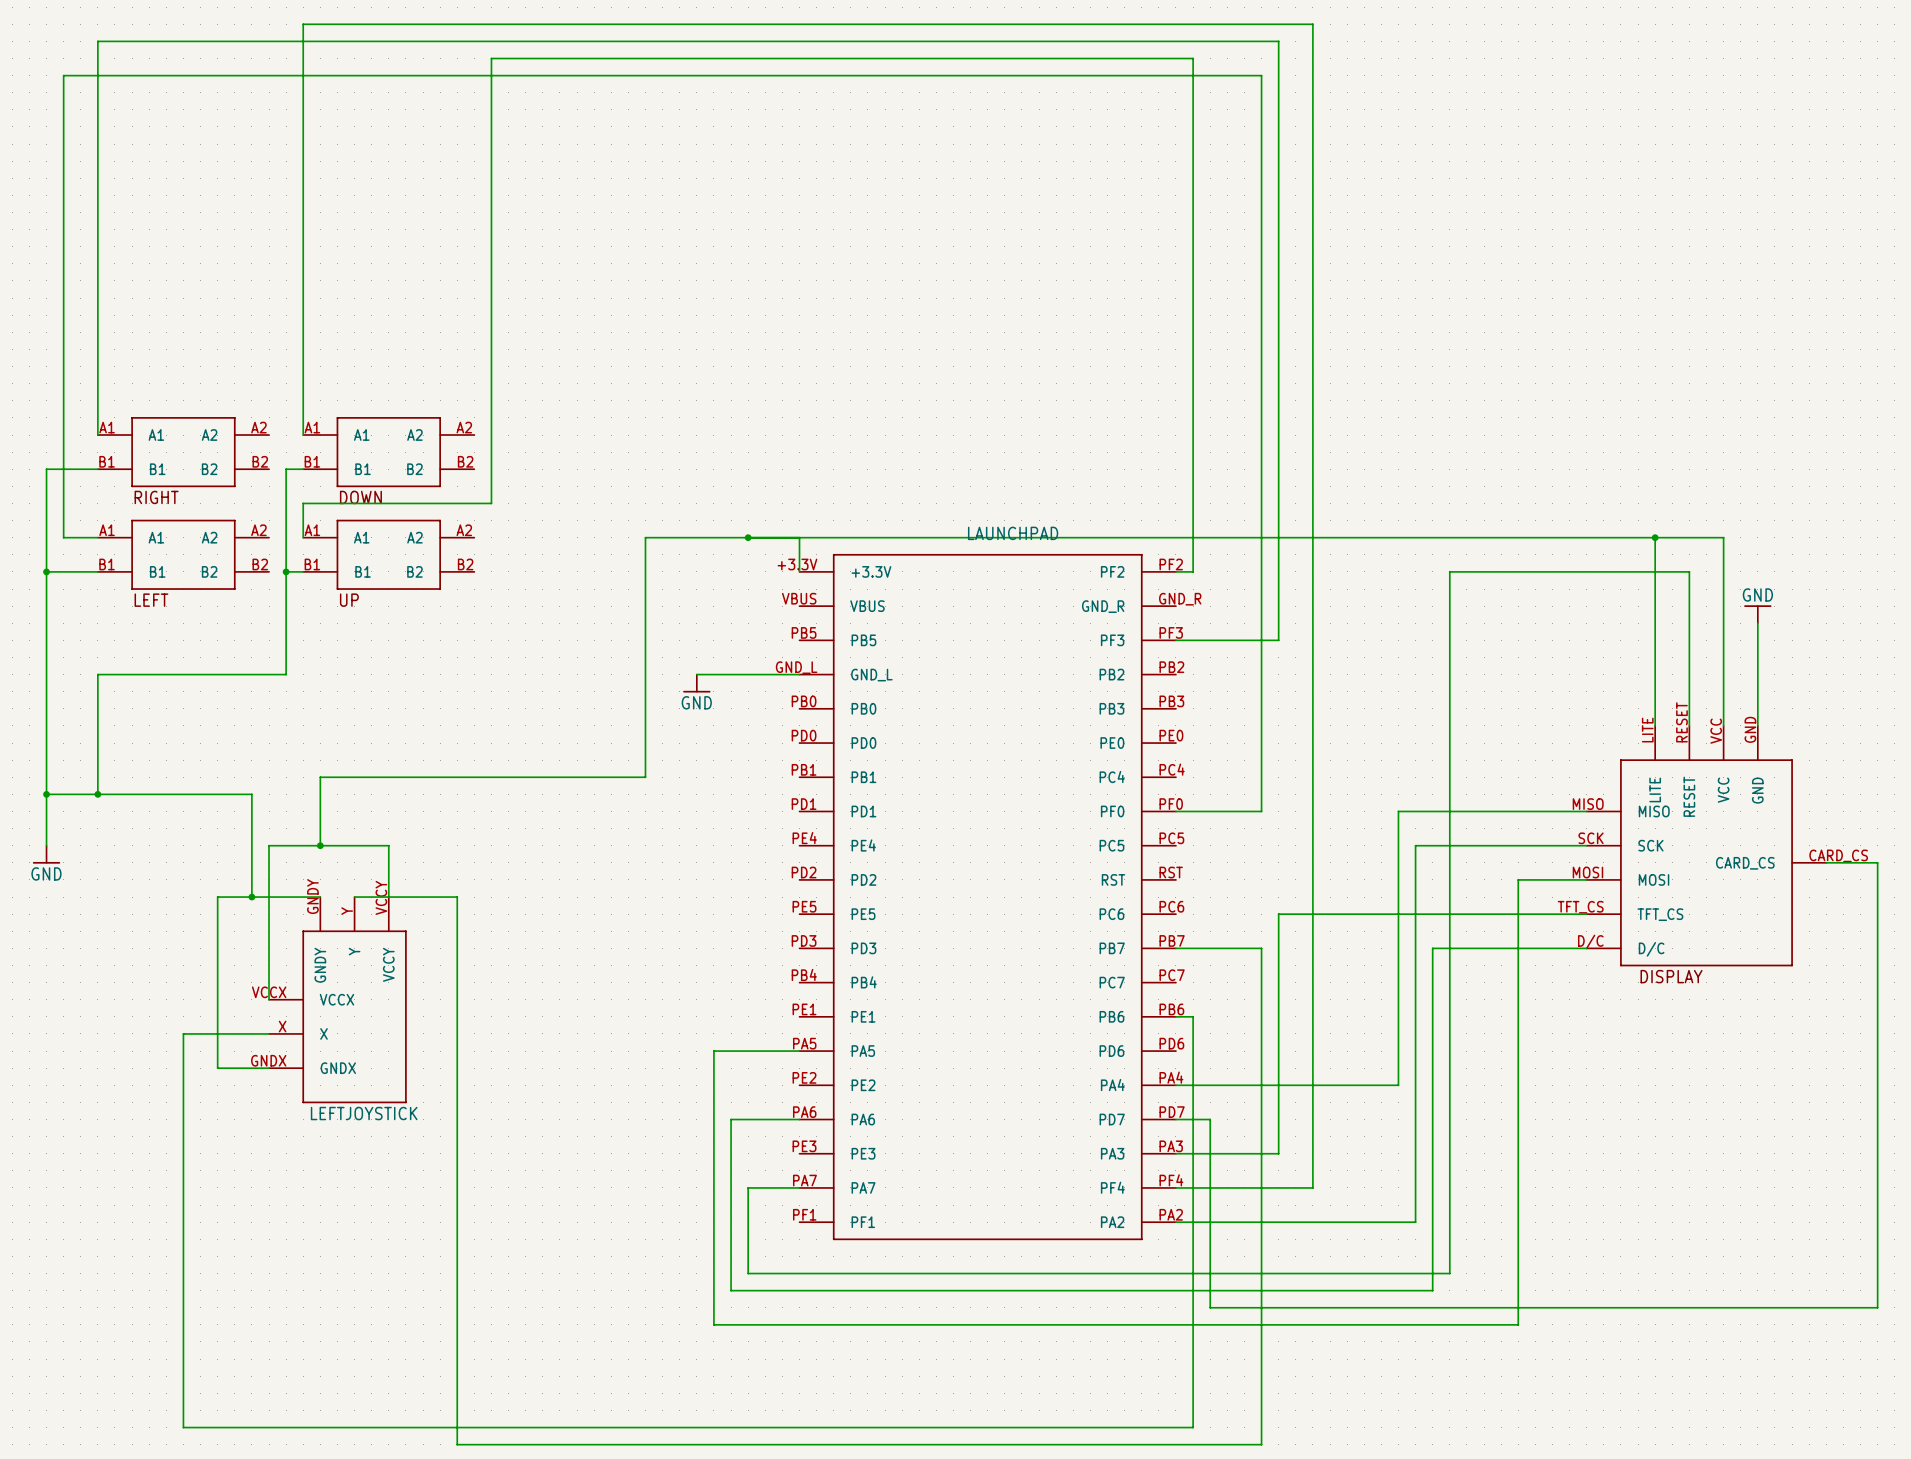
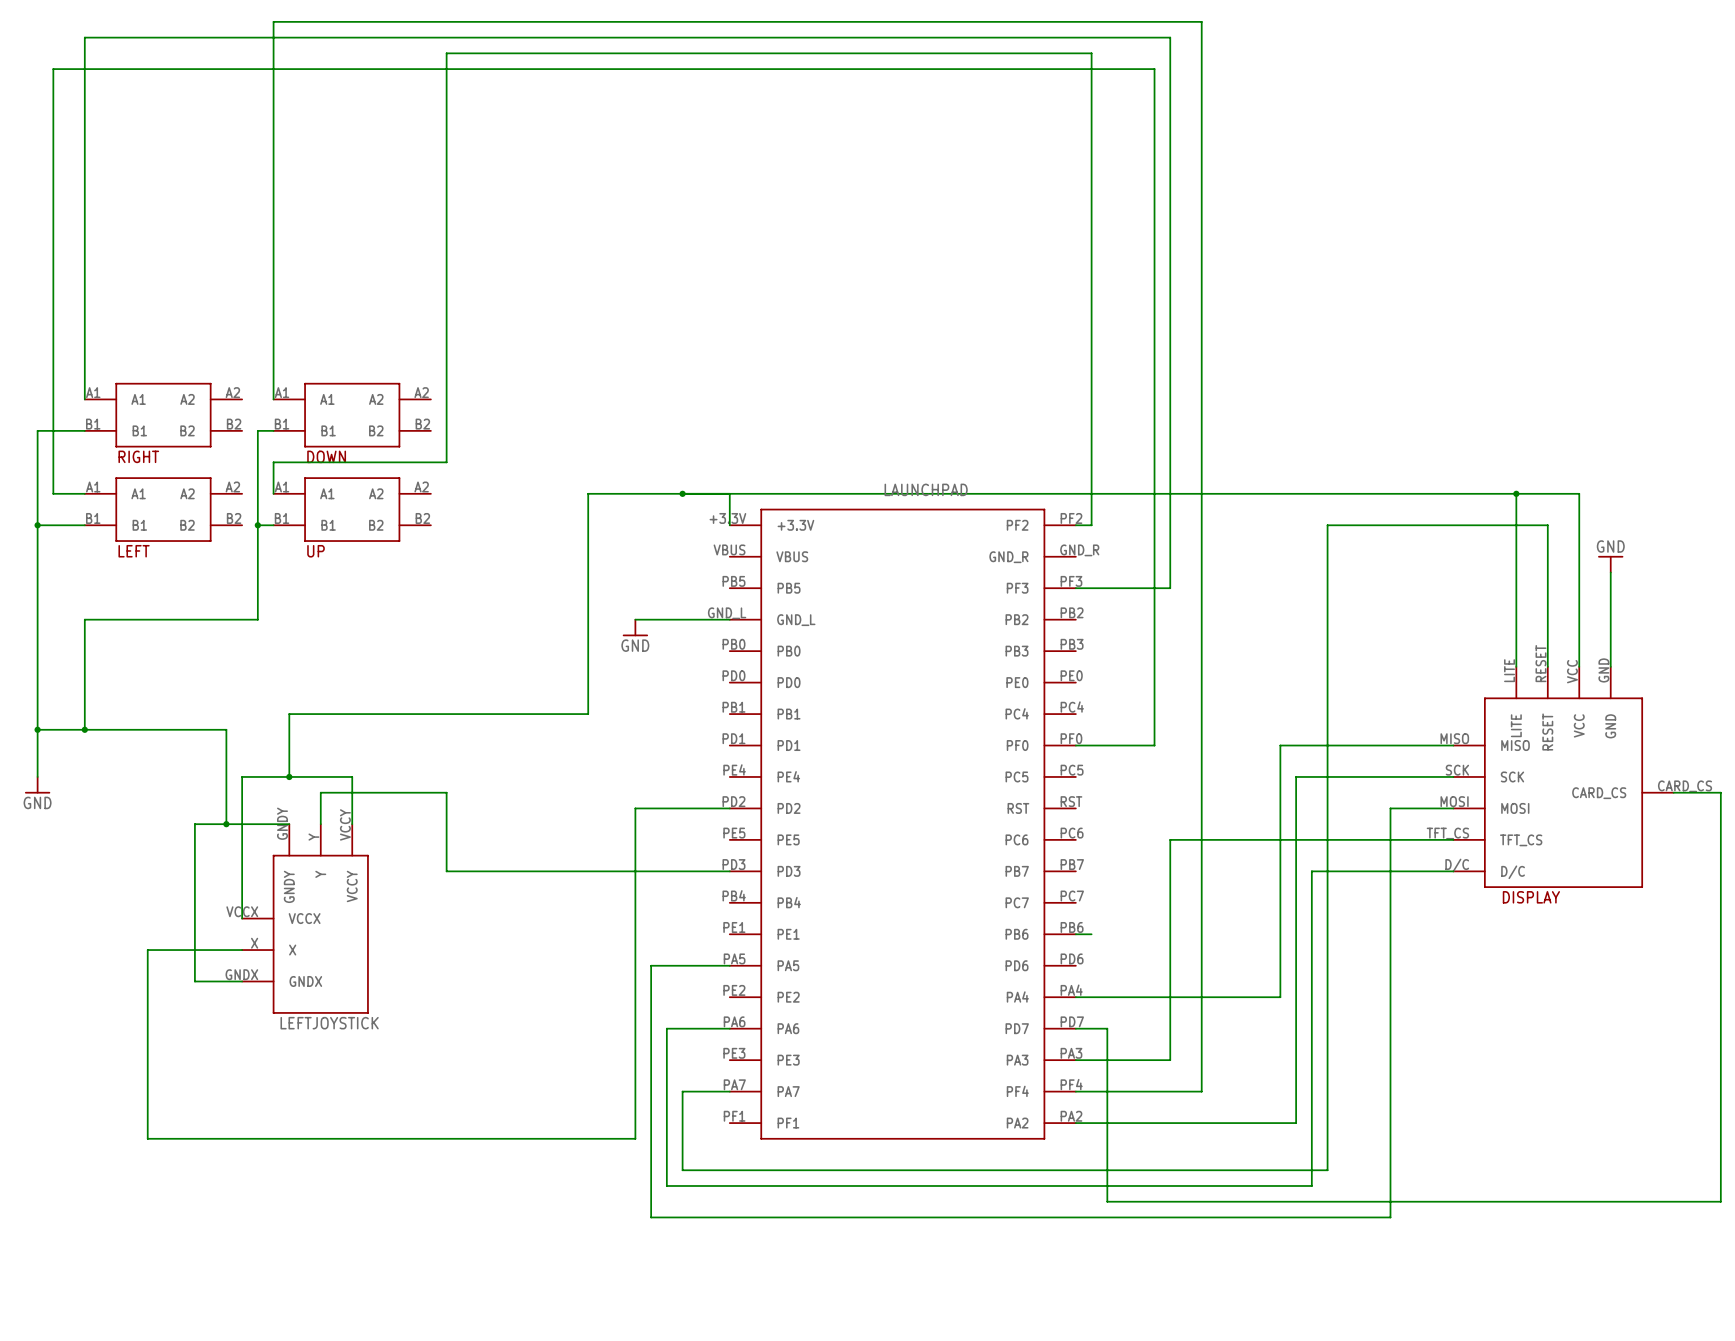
wire: (354, 897) (457, 897) (457, 1444) (1261, 1444) (1261, 948) (1175, 948) -> (320, 824) (320, 792) (446, 792) (446, 871) (729, 871)
wire: (1193, 1016) (1193, 1427) (183, 1427) (183, 1033) -> (729, 808) (635, 808) (635, 1138) (147, 1138) (147, 950) (163, 950)

